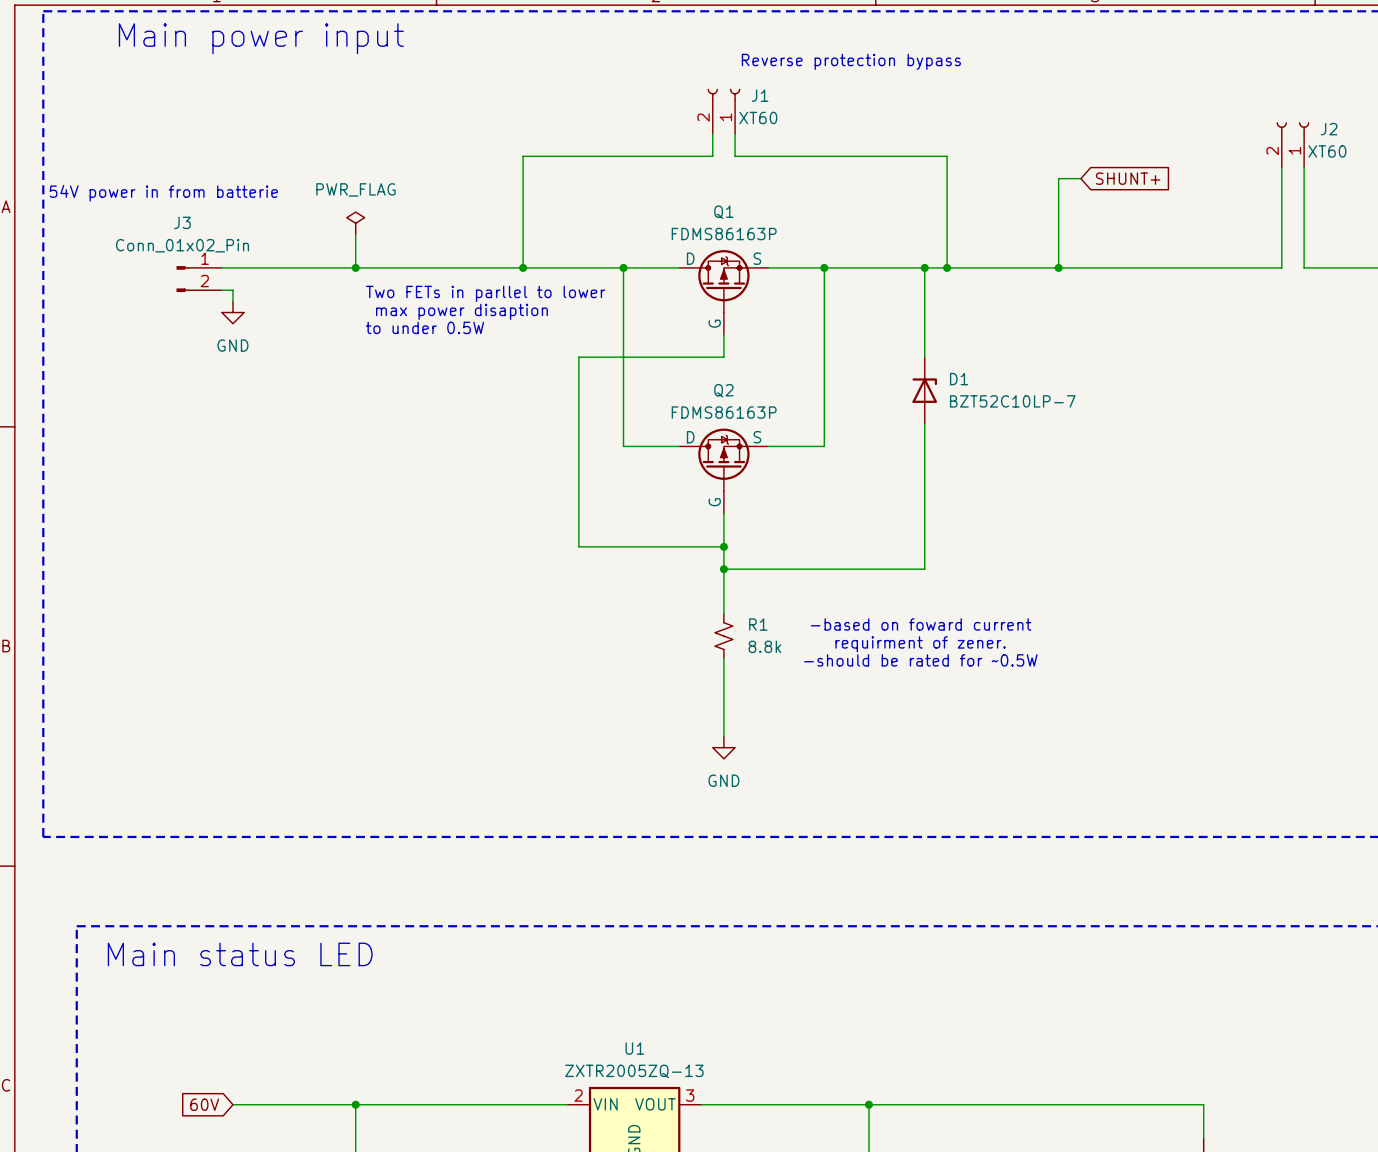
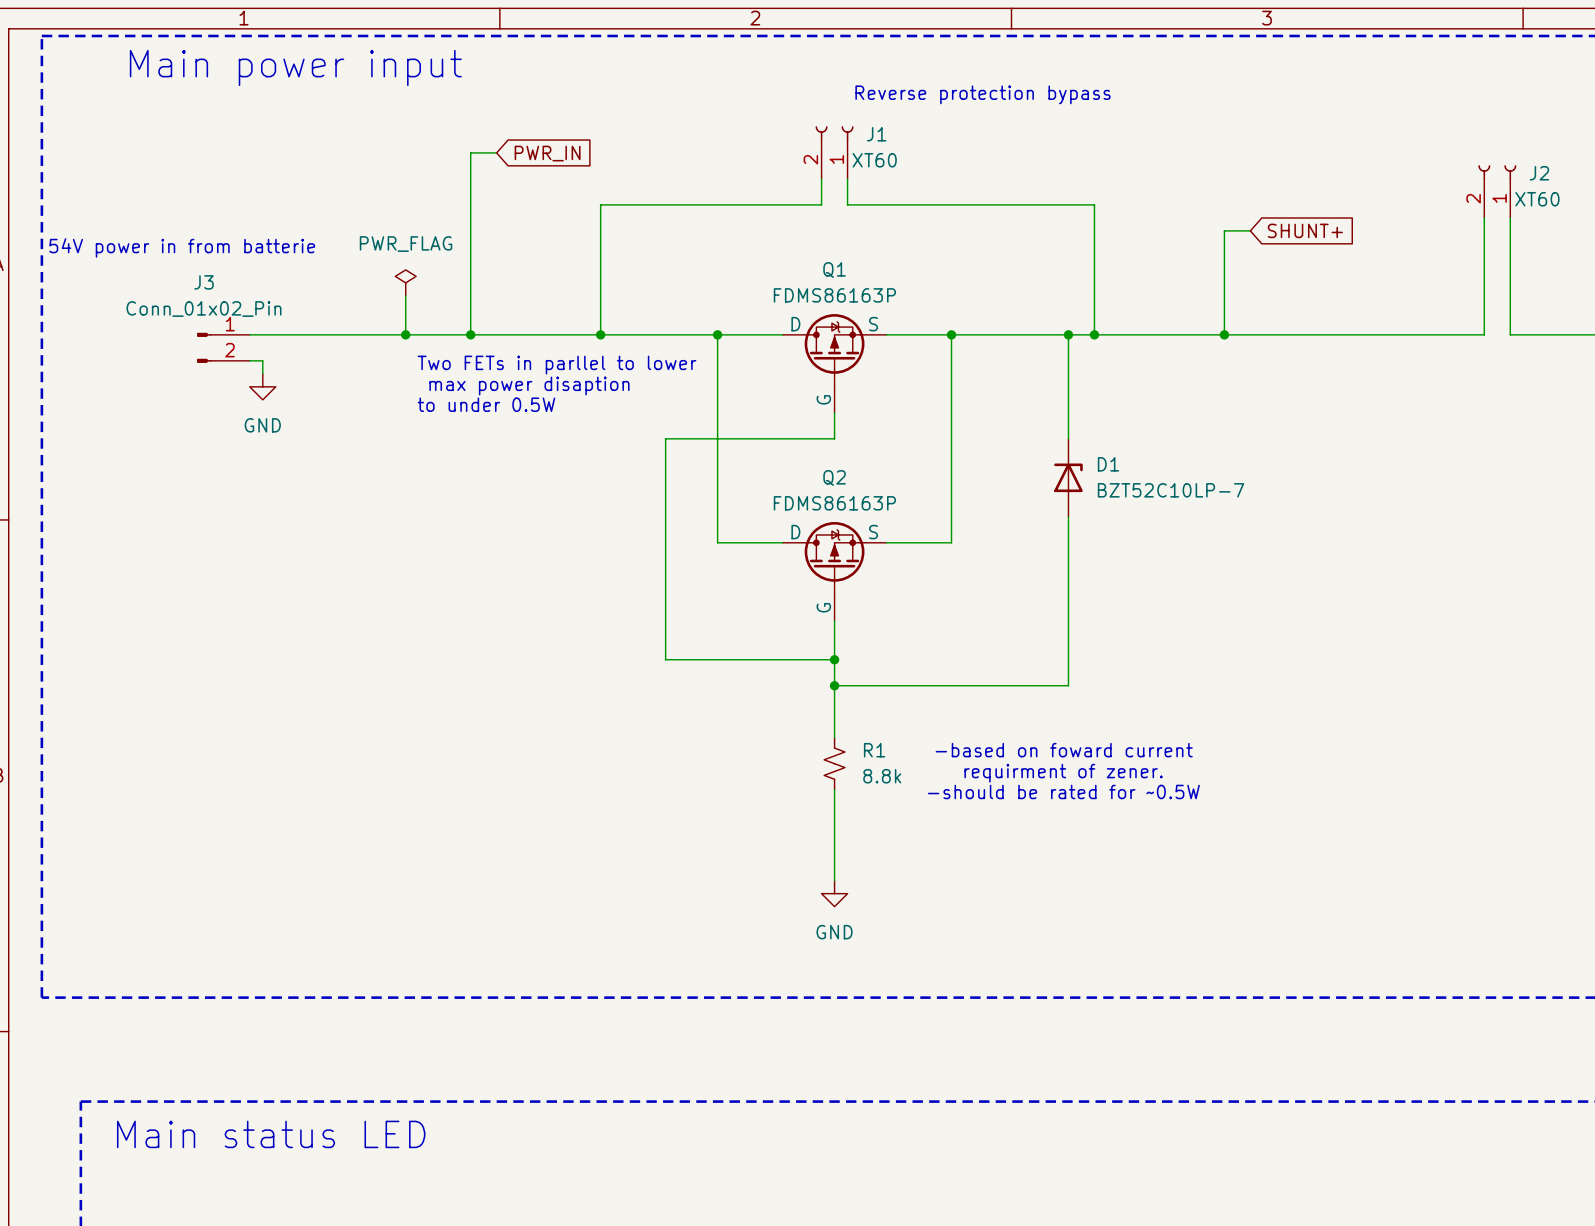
wire: none -> (496, 152) (470, 152) (470, 334)
global label: none -> PWR_IN (547, 153)
junction: none -> (470, 334)

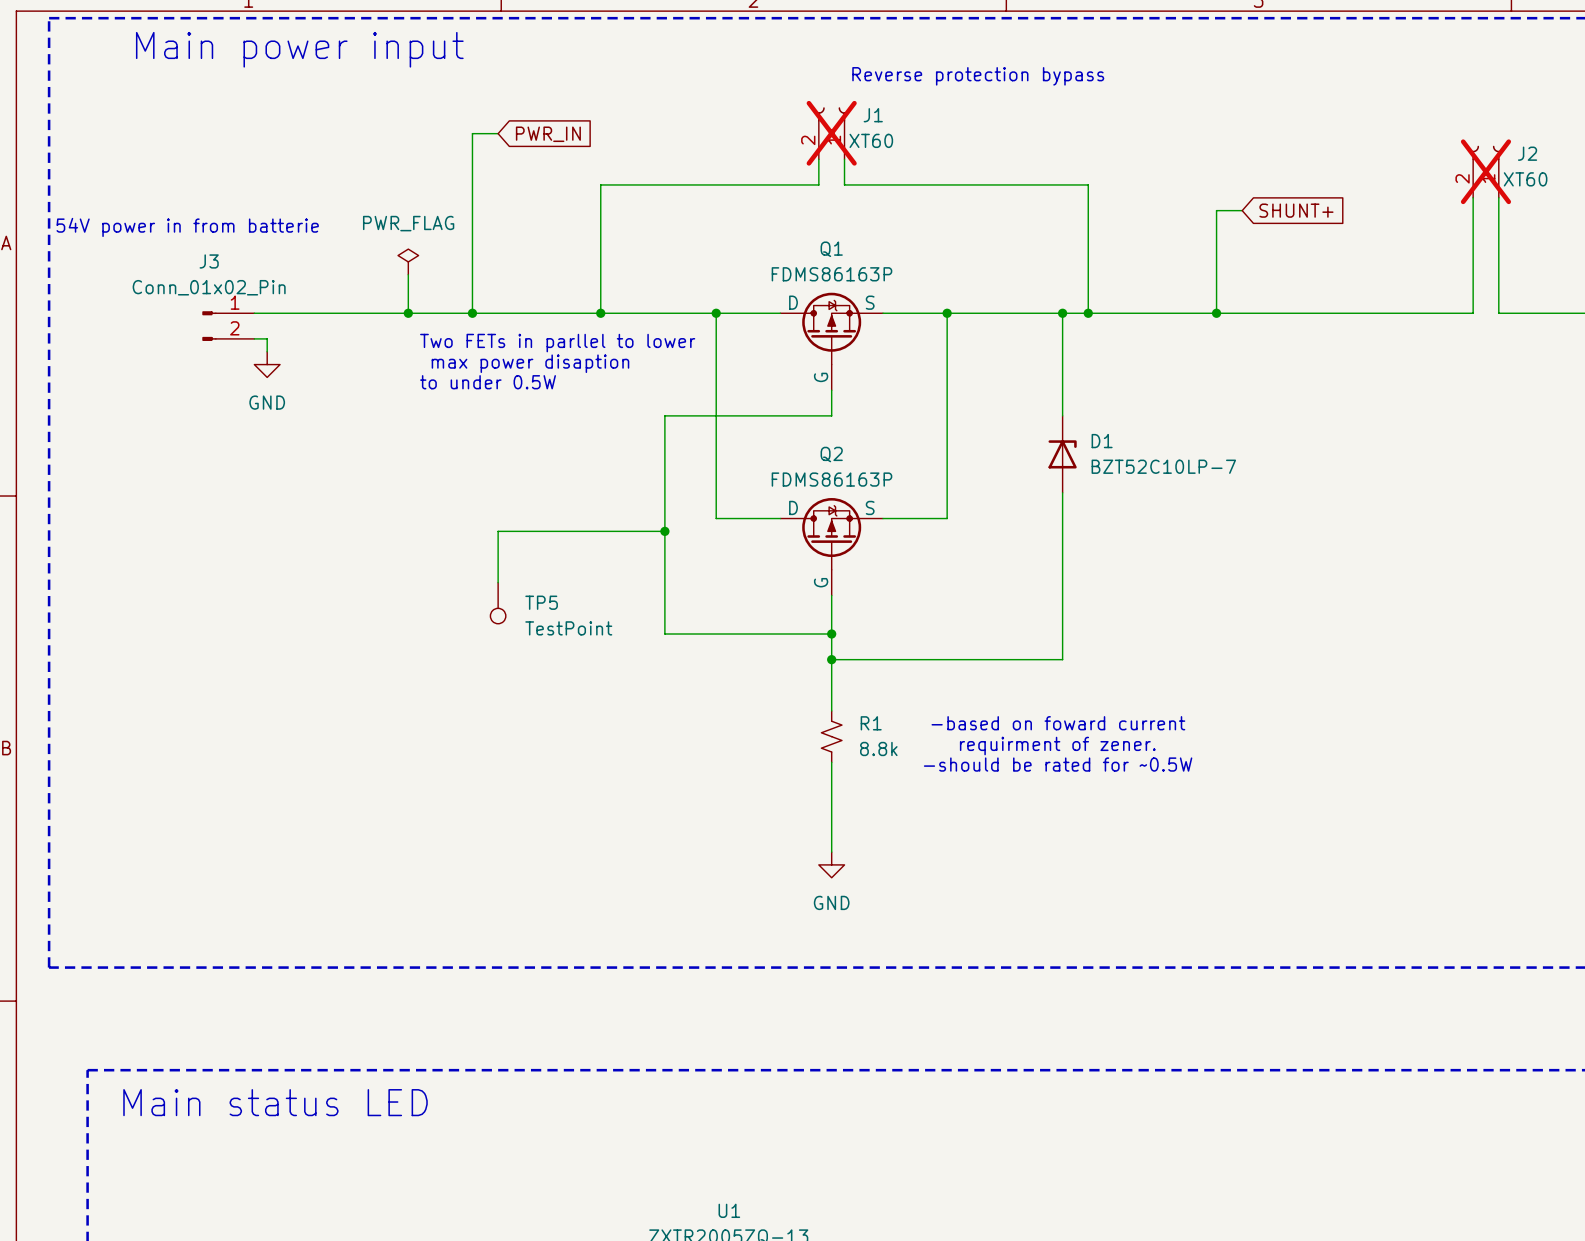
J1 do-not-place cross: none -> (831, 133)
J2 do-not-place cross: none -> (1485, 171)
wire: none -> (664, 531) (498, 531) (498, 582)
junction: none -> (664, 531)
TP5: none -> TestPoint (498, 603)

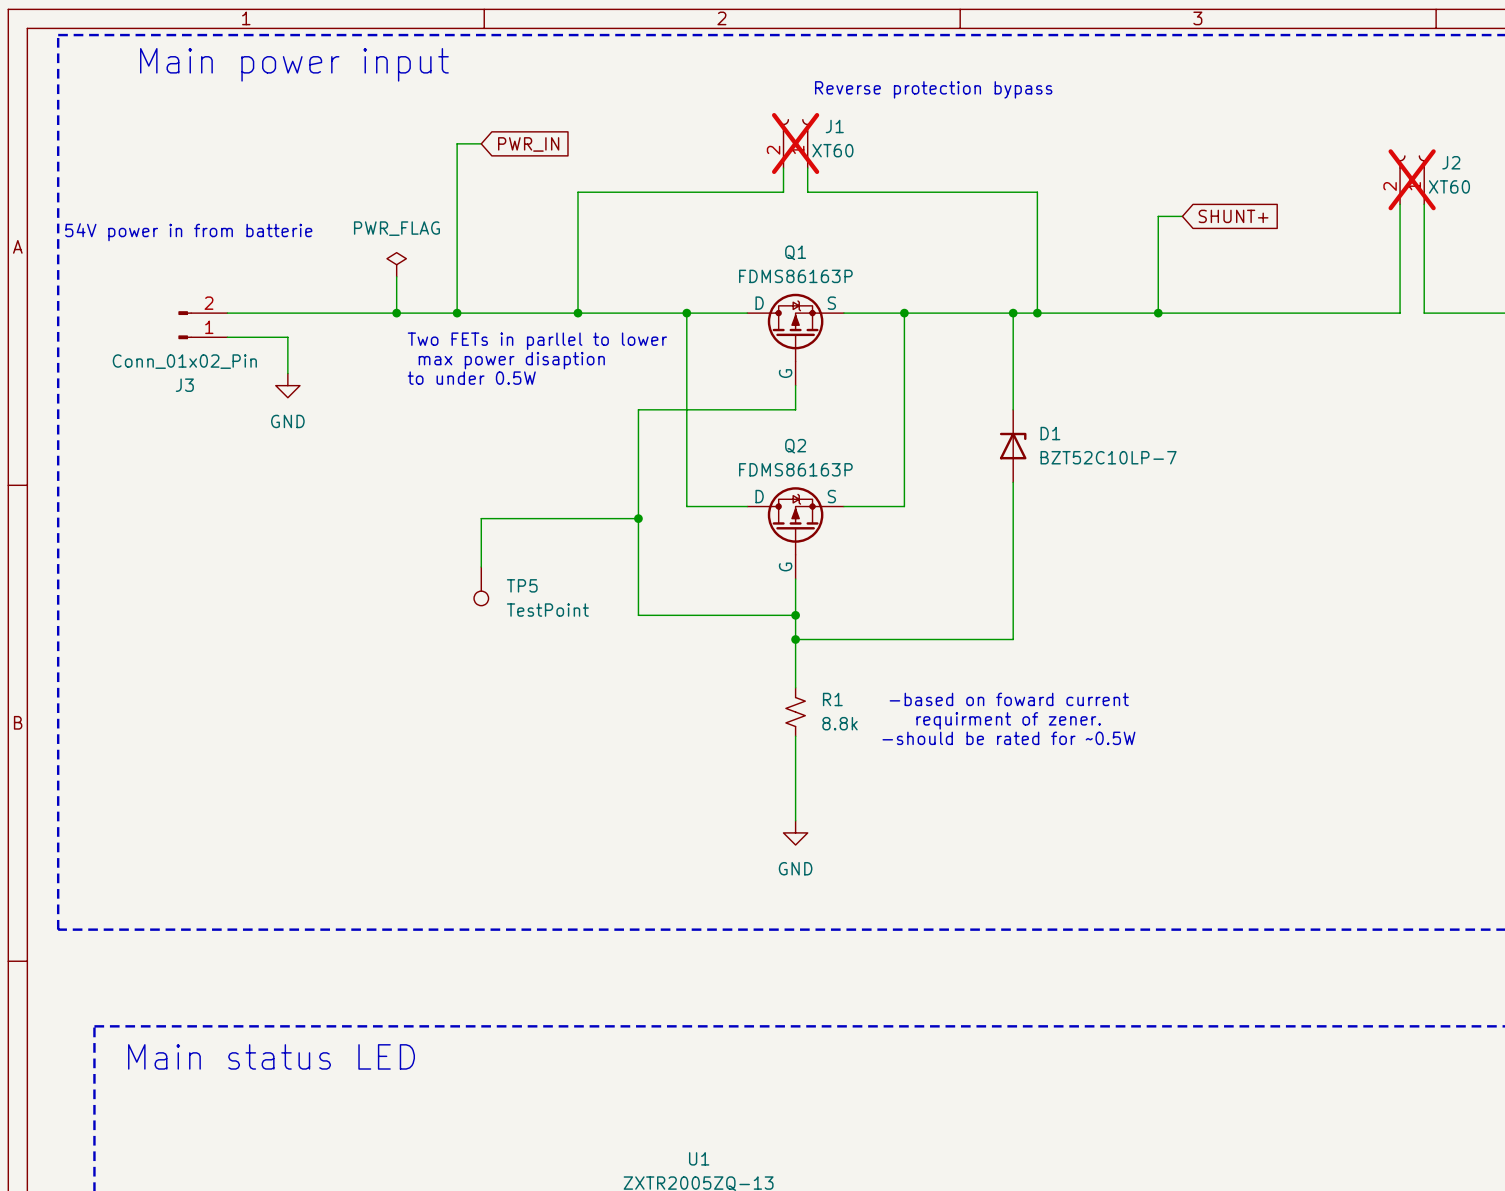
J3 flip: as is (209, 326) -> up-down (185, 325)
wire: (267, 338) (267, 351) -> (263, 337) (287, 337) (287, 373)
power symbol position: GND (267, 364) -> GND (287, 385)

